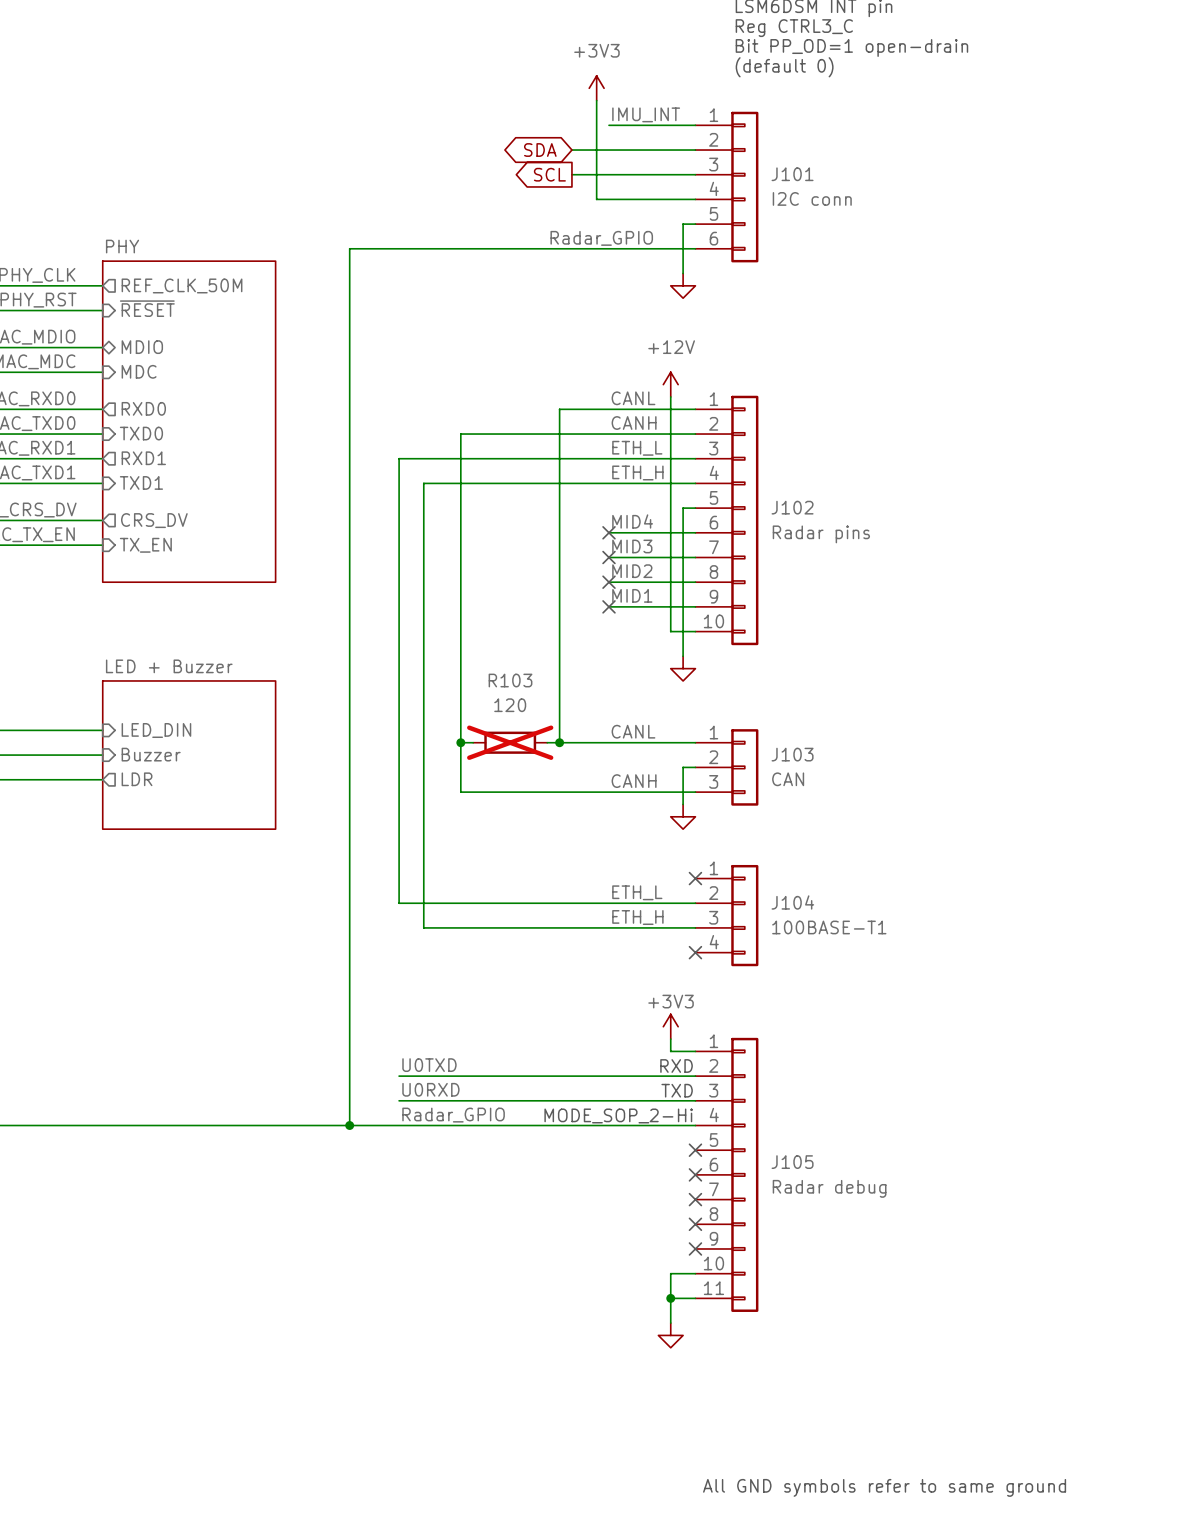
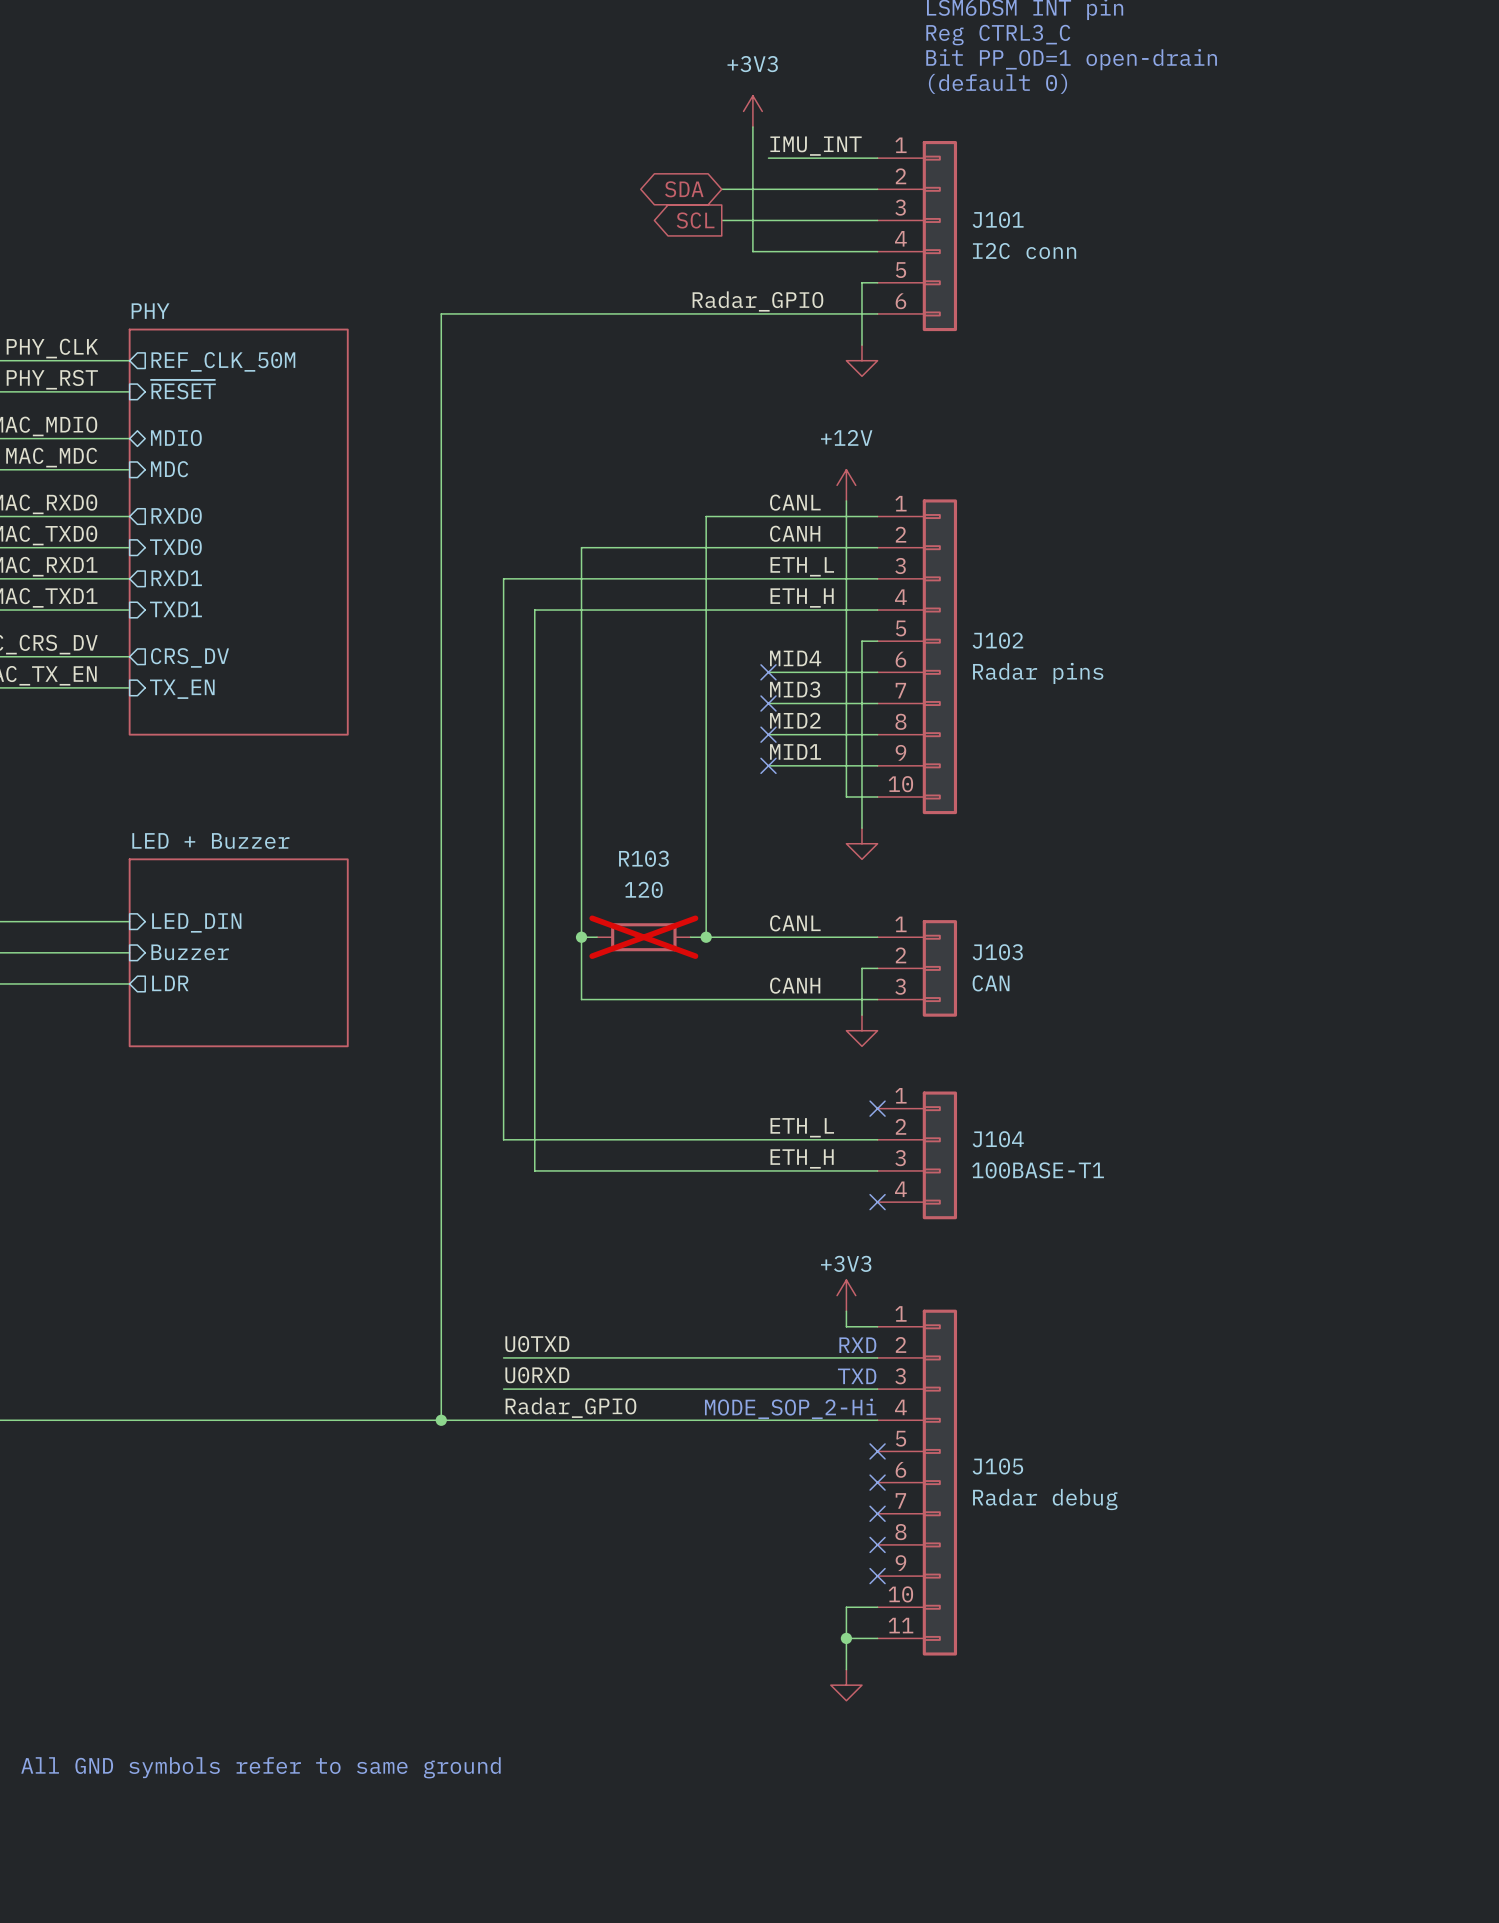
text: none -> All GND symbols refer to same ground (260, 1767)
text: All GND symbols refer to same ground (884, 1487) -> none

